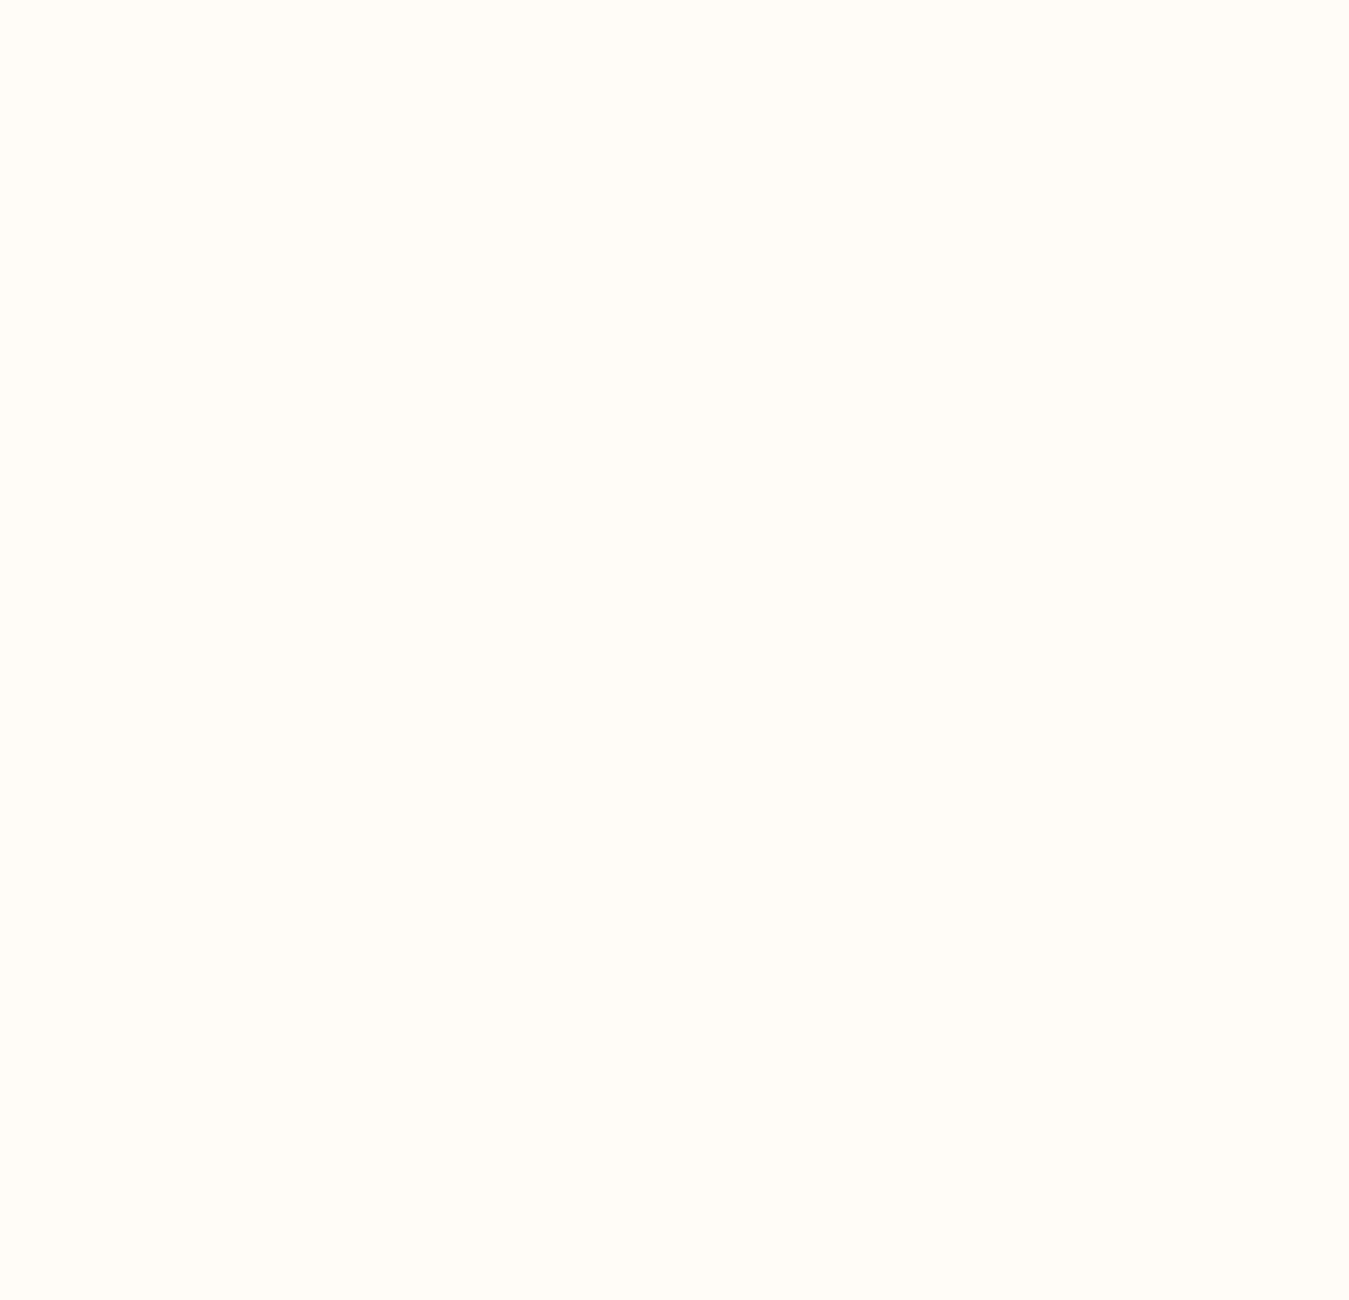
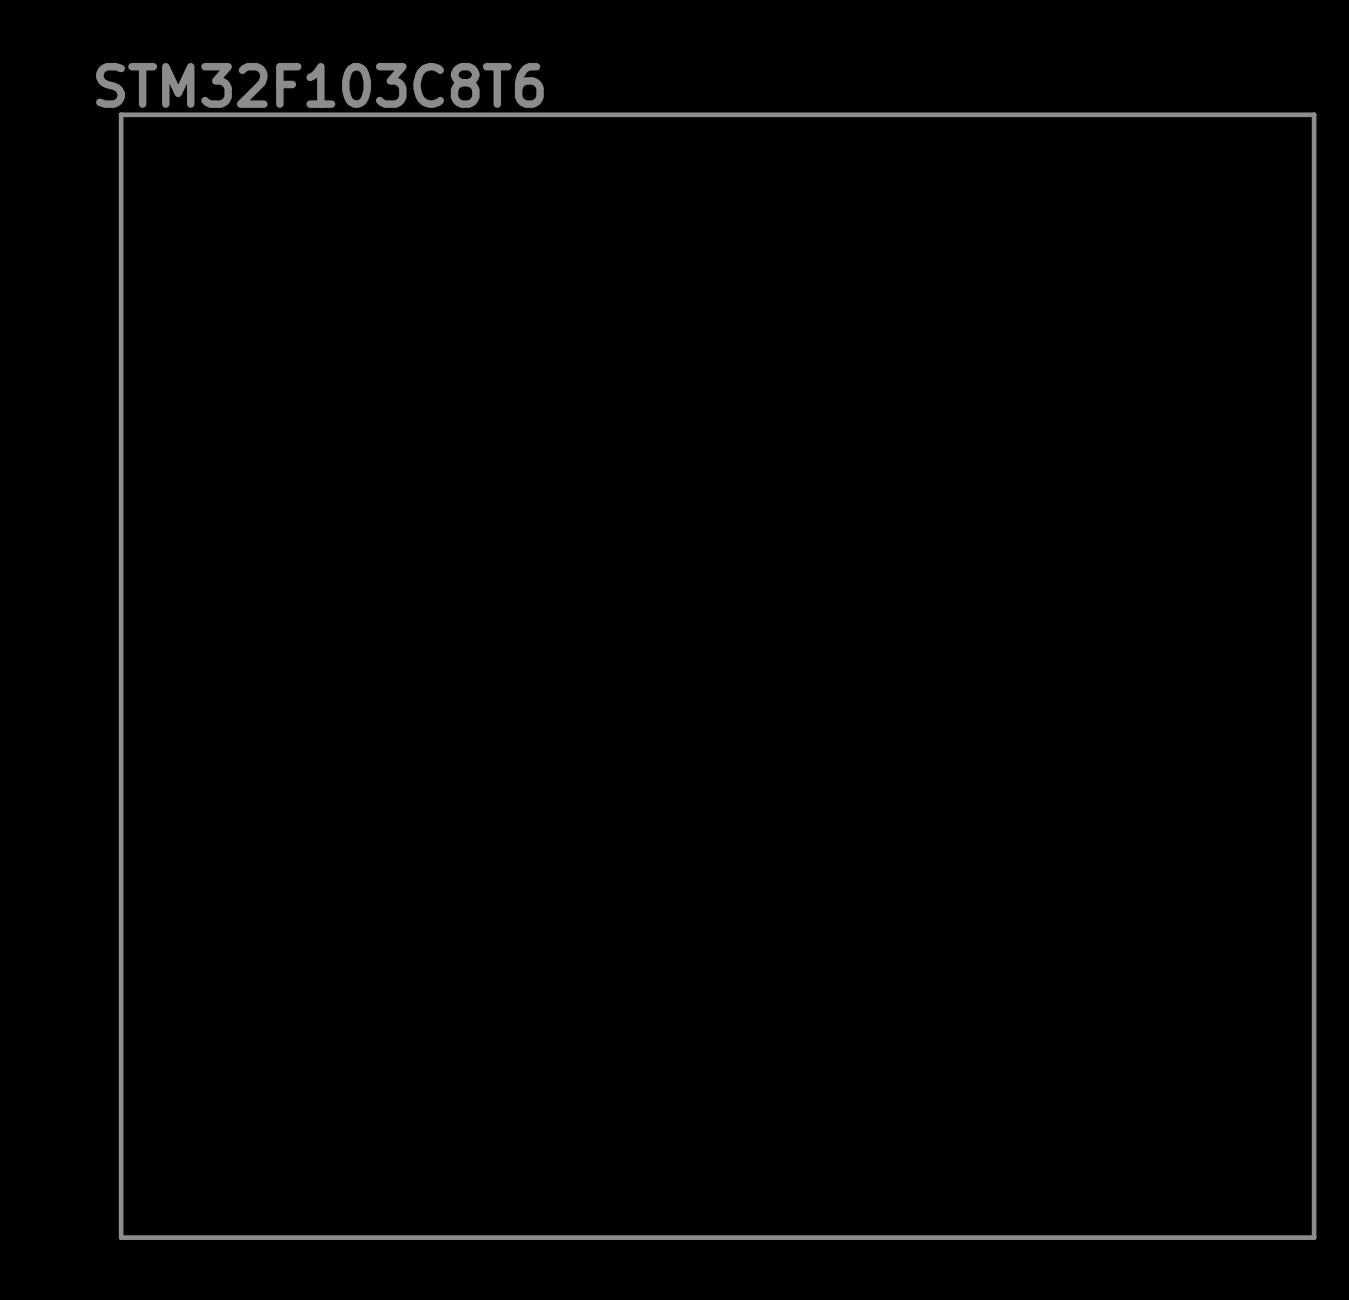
text: none -> STM32F103C8T6 (319, 85)
line: none -> (121, 114) (1314, 114) (1314, 1237) (121, 1237) (121, 114)

